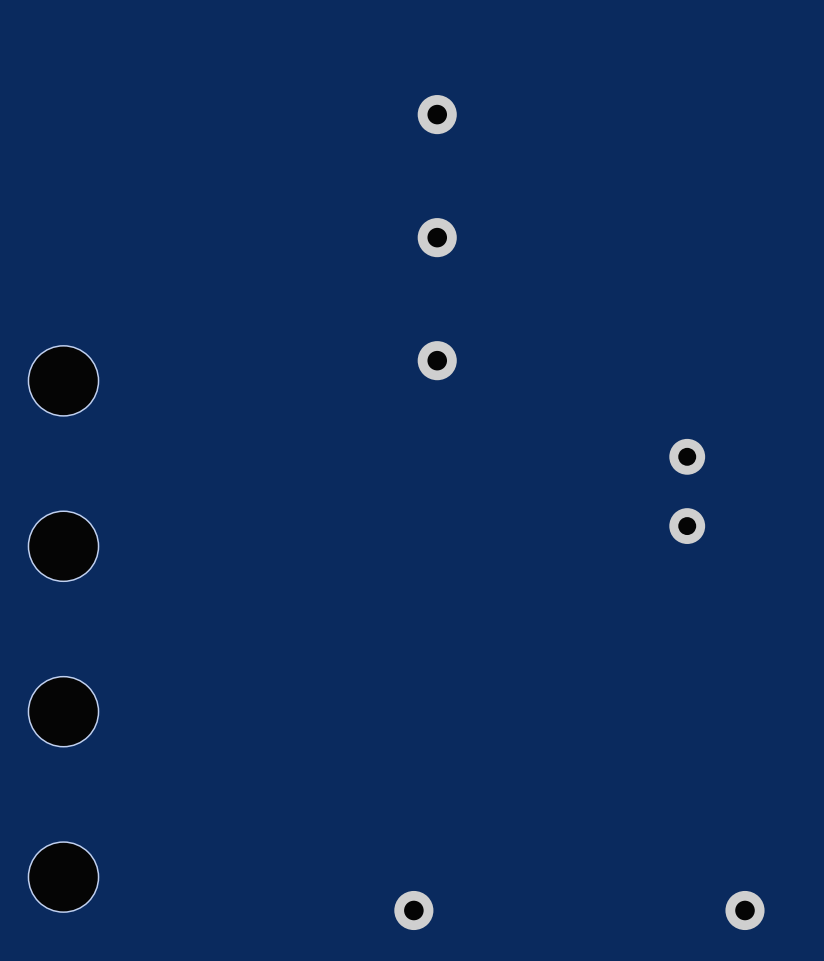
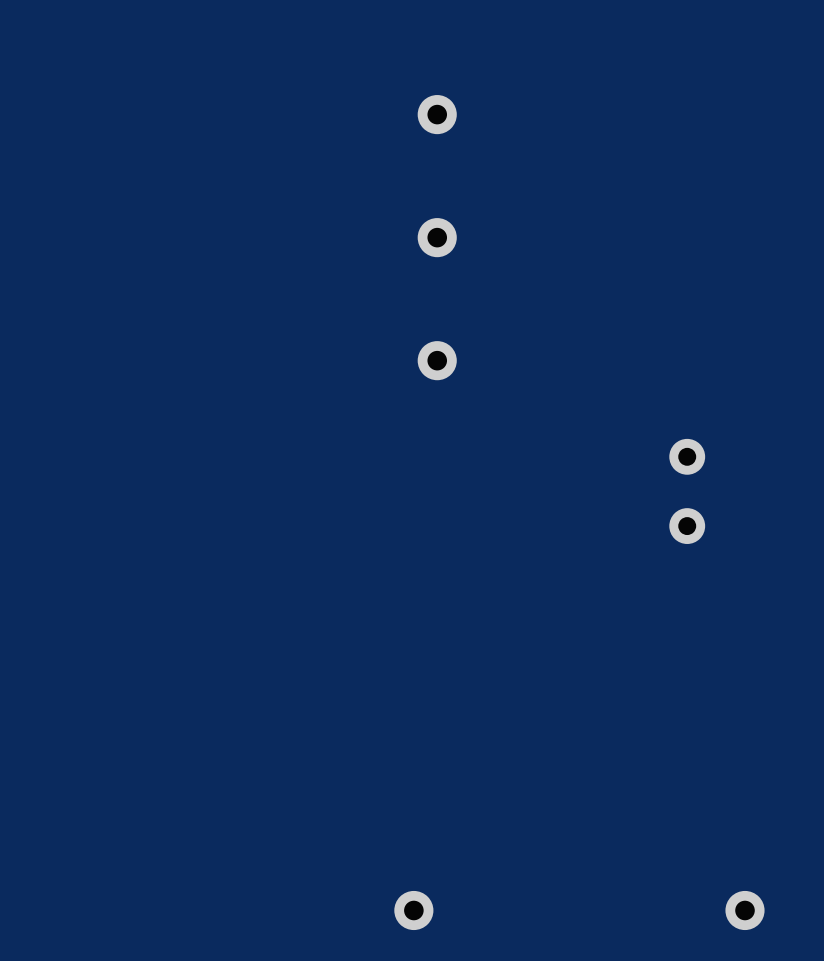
part: (63, 380) -> none
part: (63, 546) -> none
part: (63, 711) -> none
part: (63, 877) -> none

